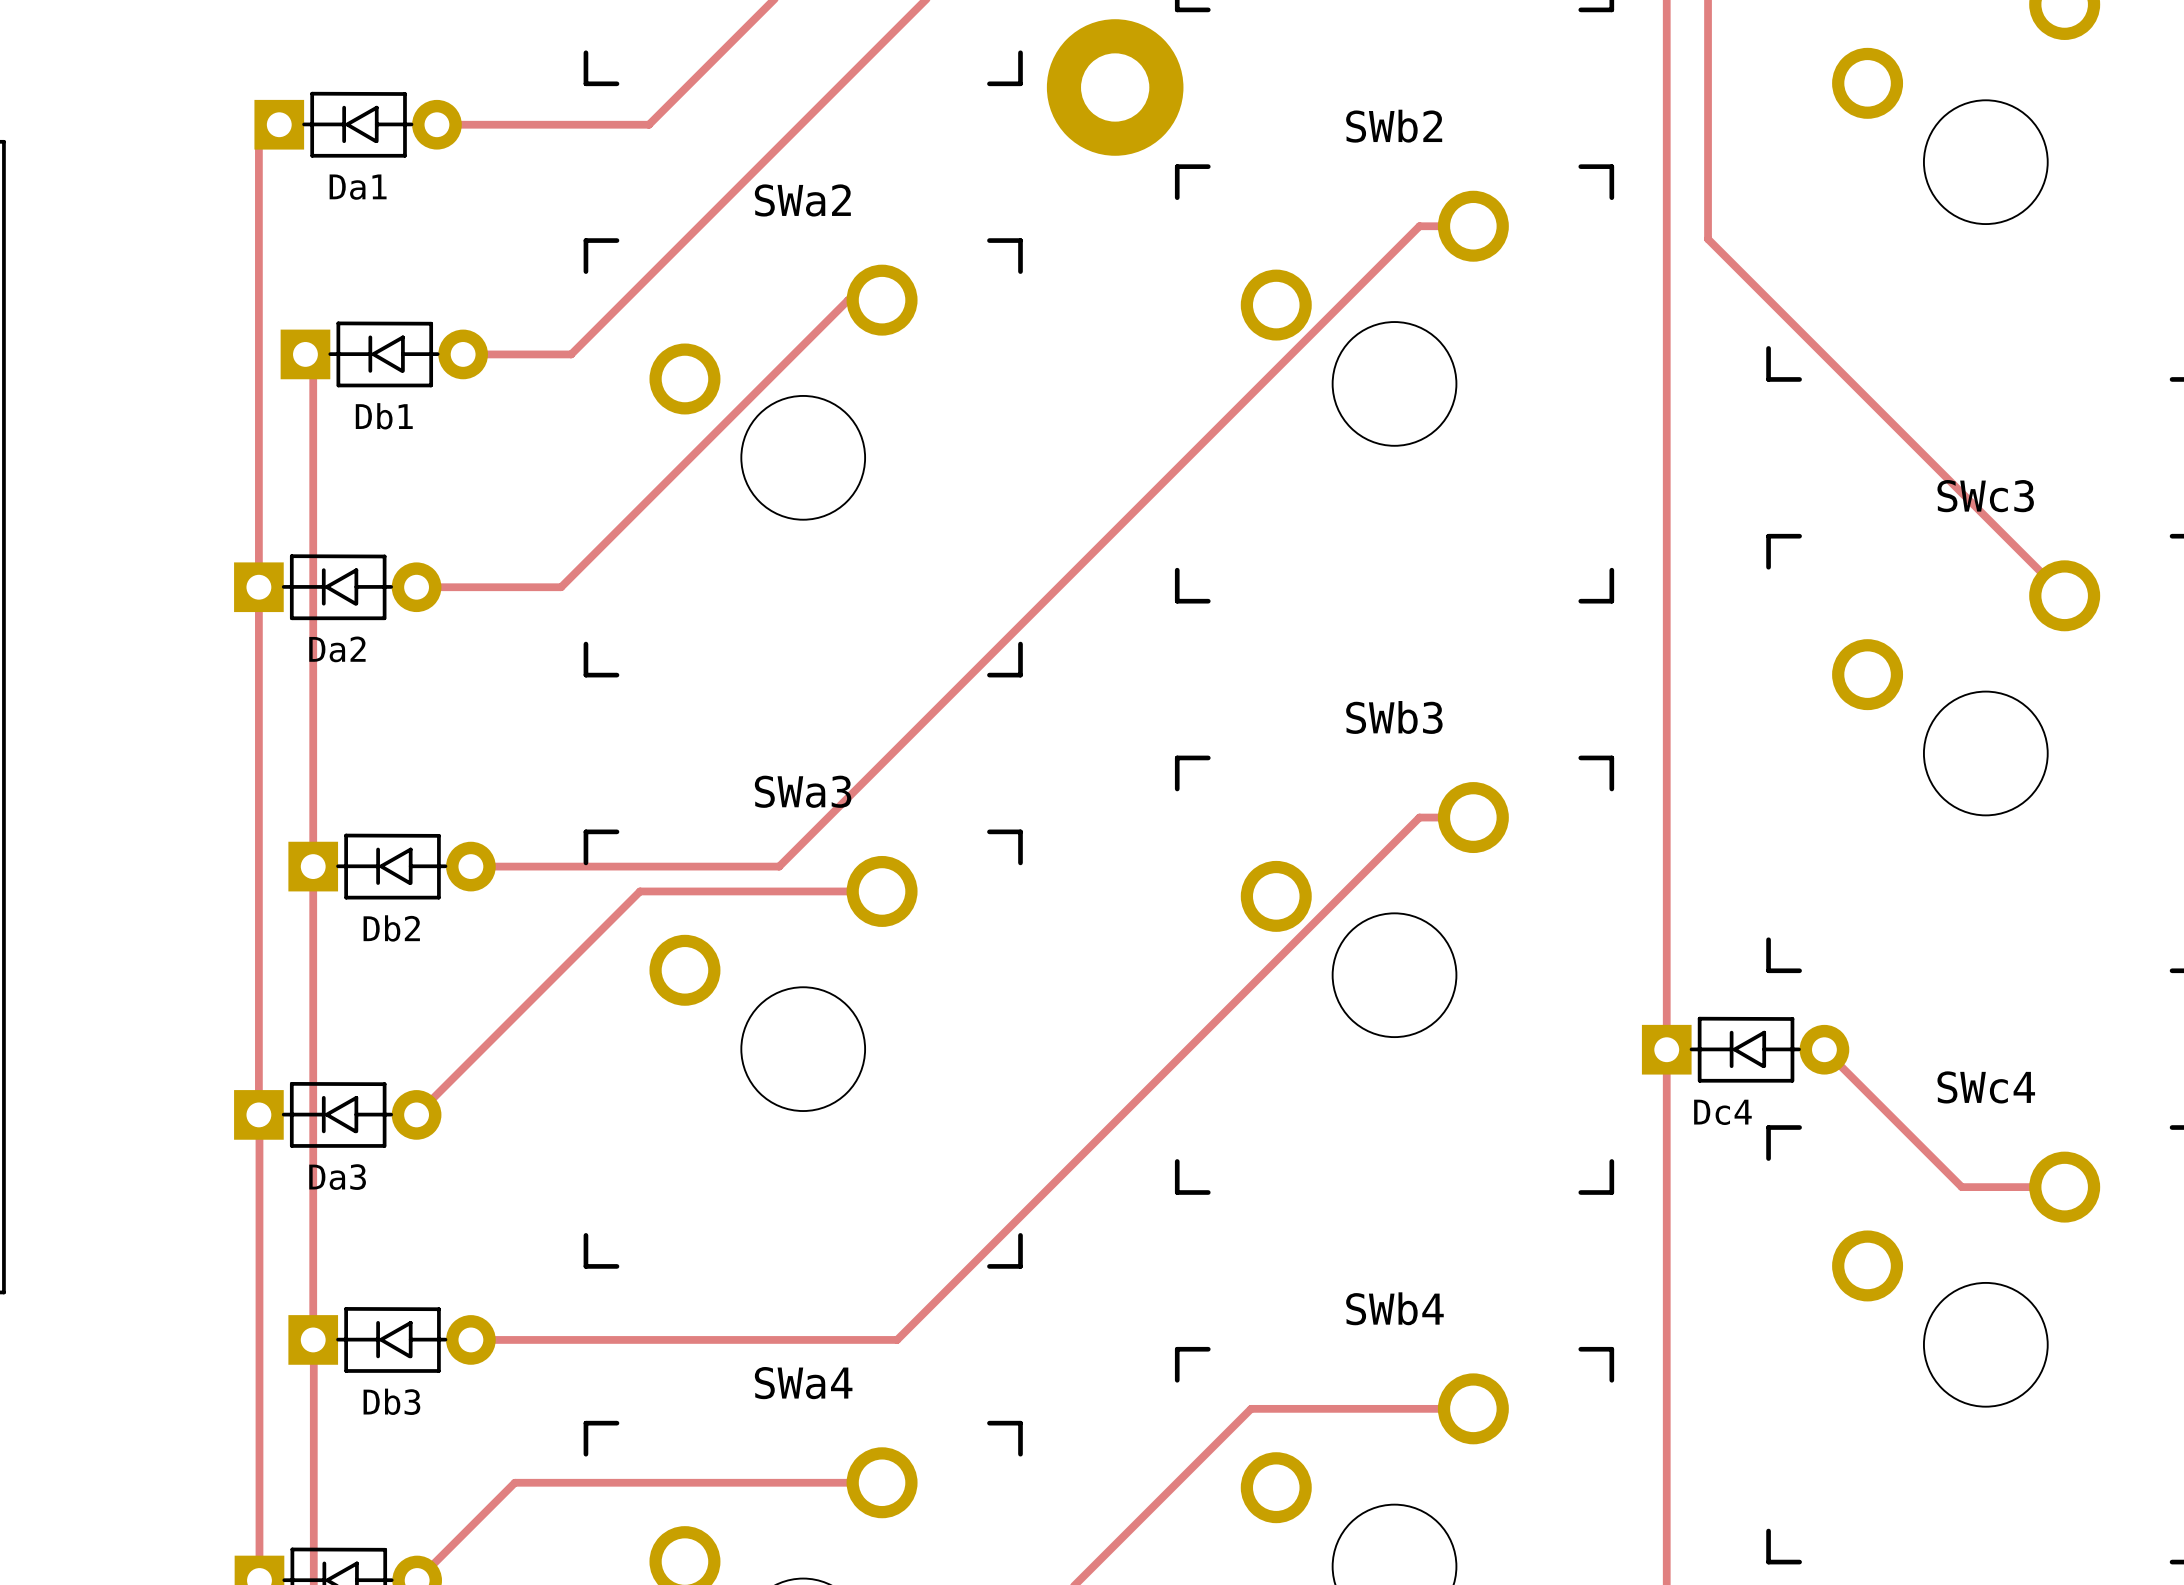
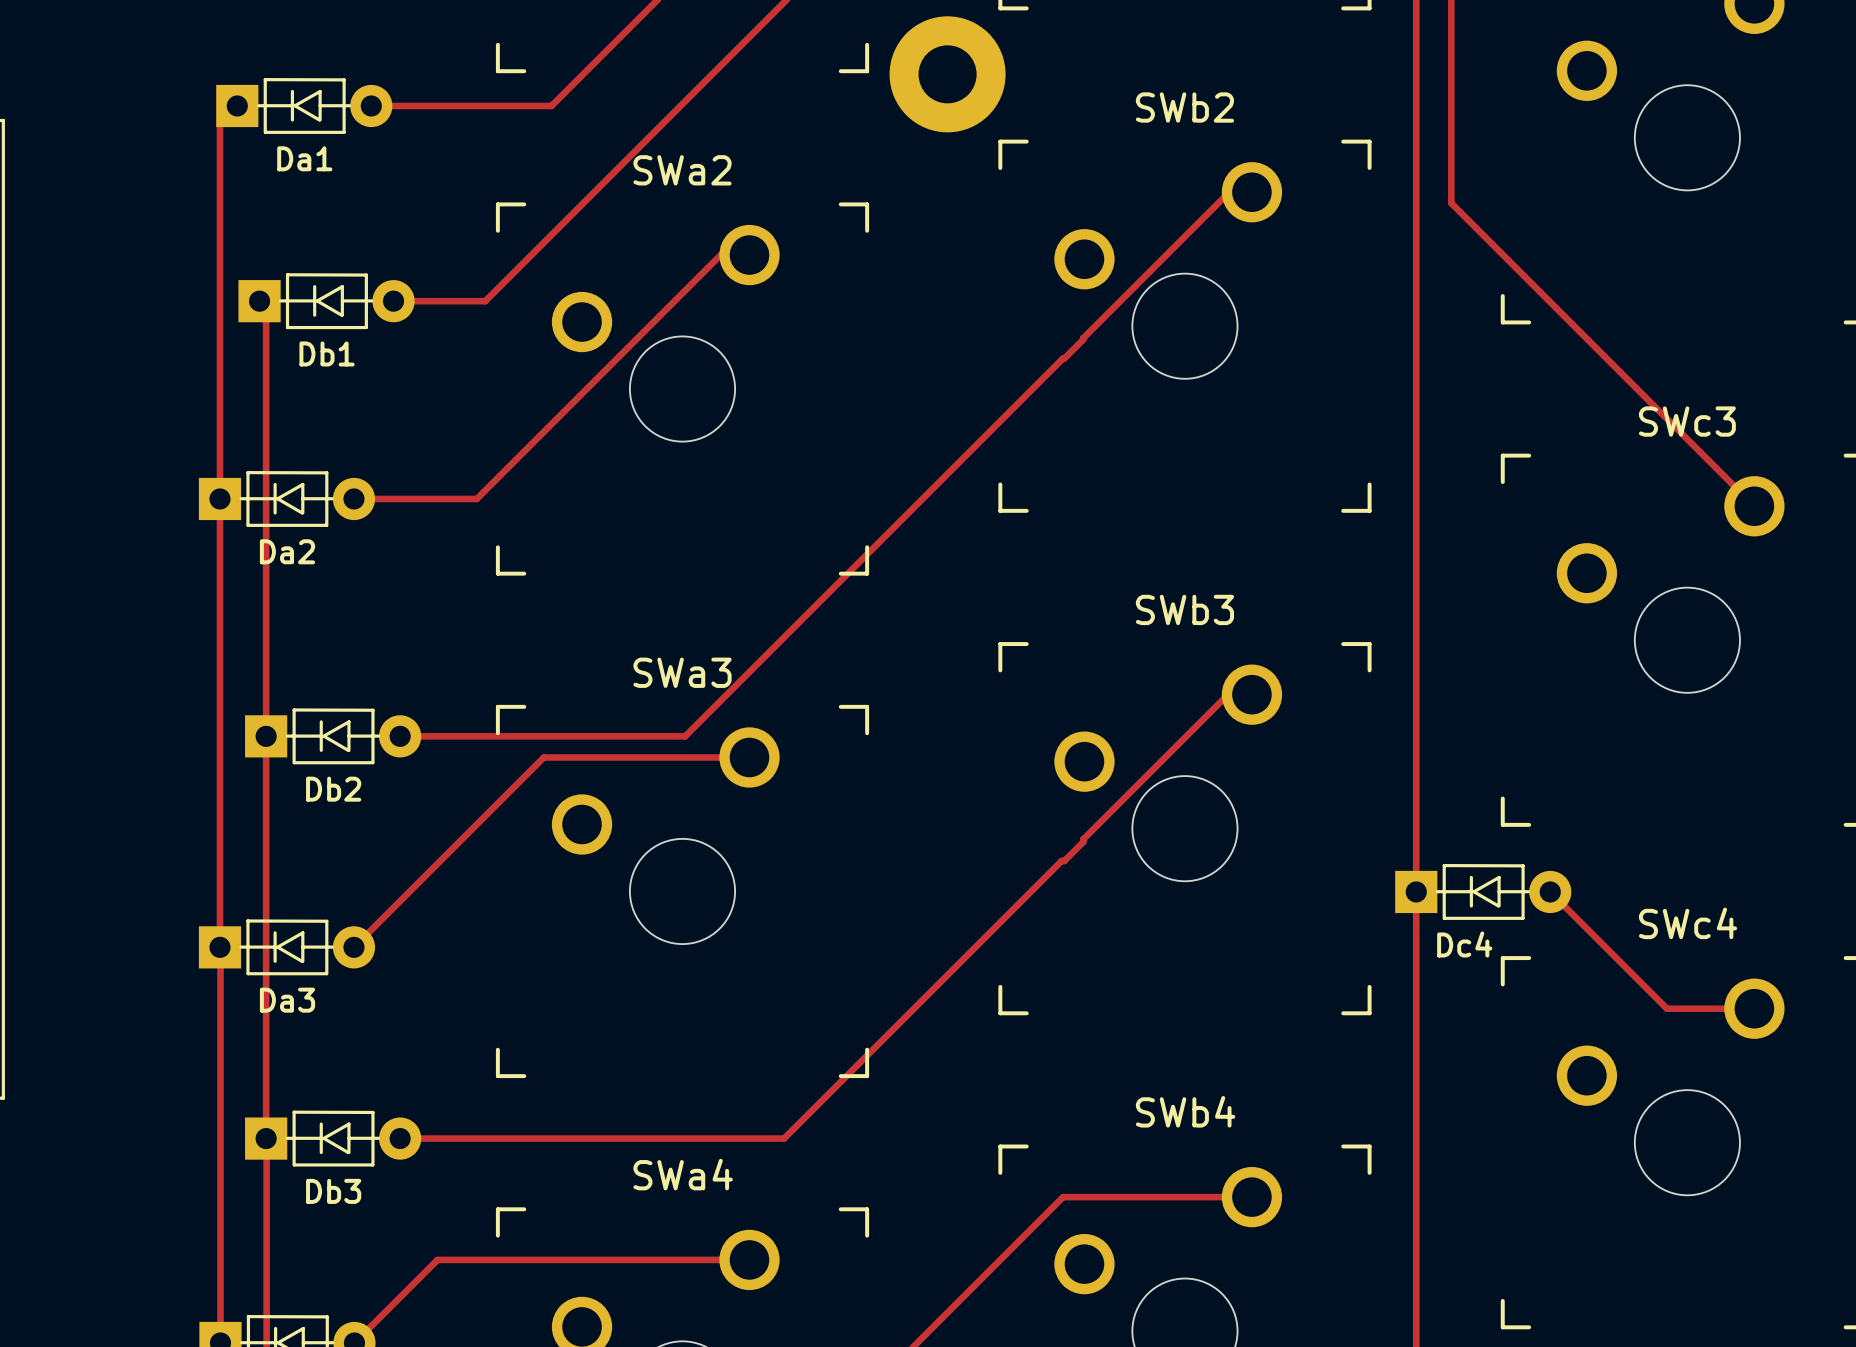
track: (1446, 226) (1419, 226) (779, 866) -> (1229, 192) (685, 736) (662, 736)
track: (1445, 817) (1419, 817) (897, 1339) -> (1227, 694) (1083, 839) (1083, 842) (1064, 860) (1061, 860) (784, 1138) (762, 1138)

